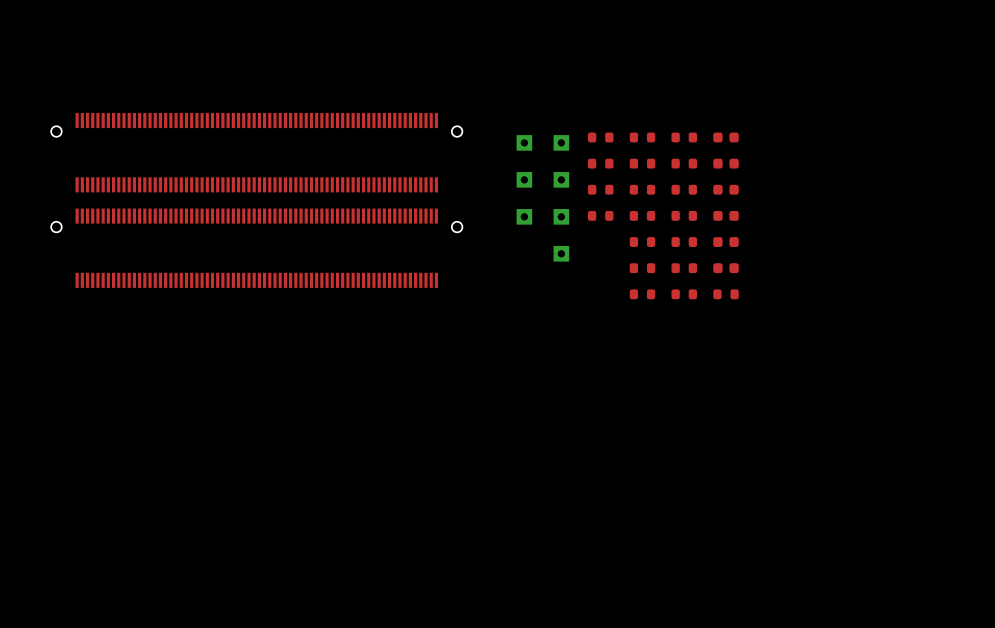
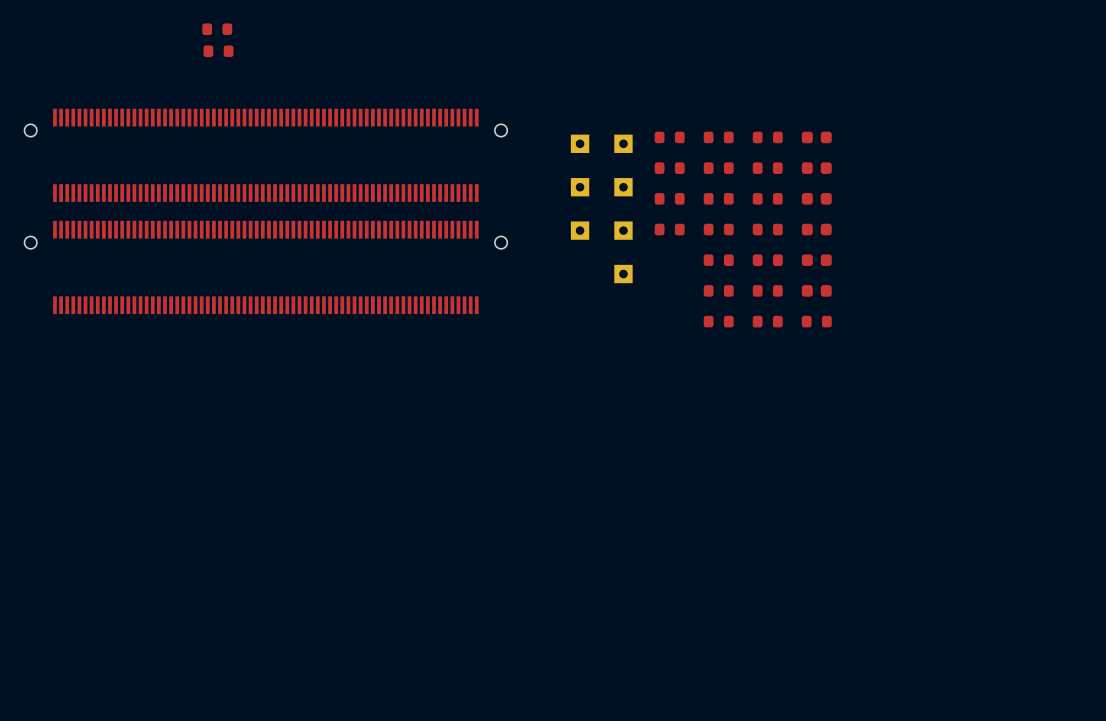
part: none -> (217, 29)
part: none -> (218, 51)

